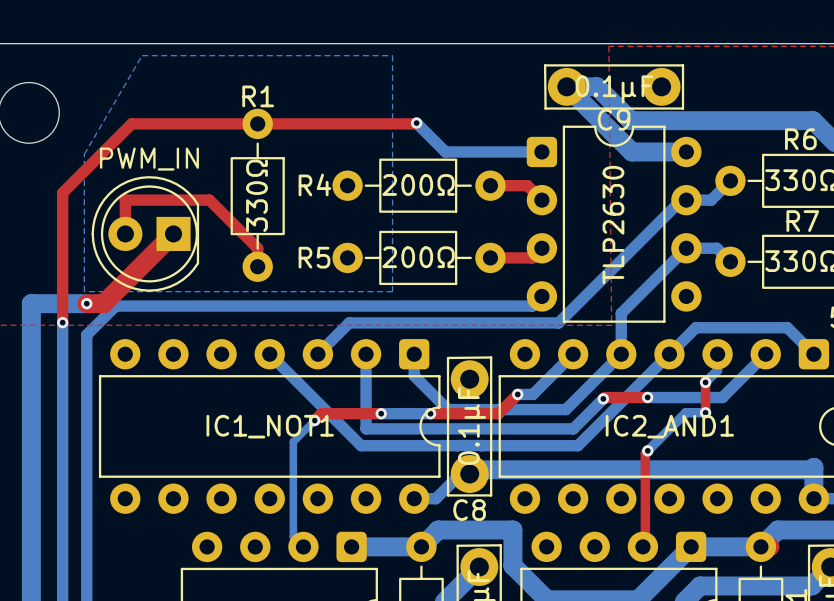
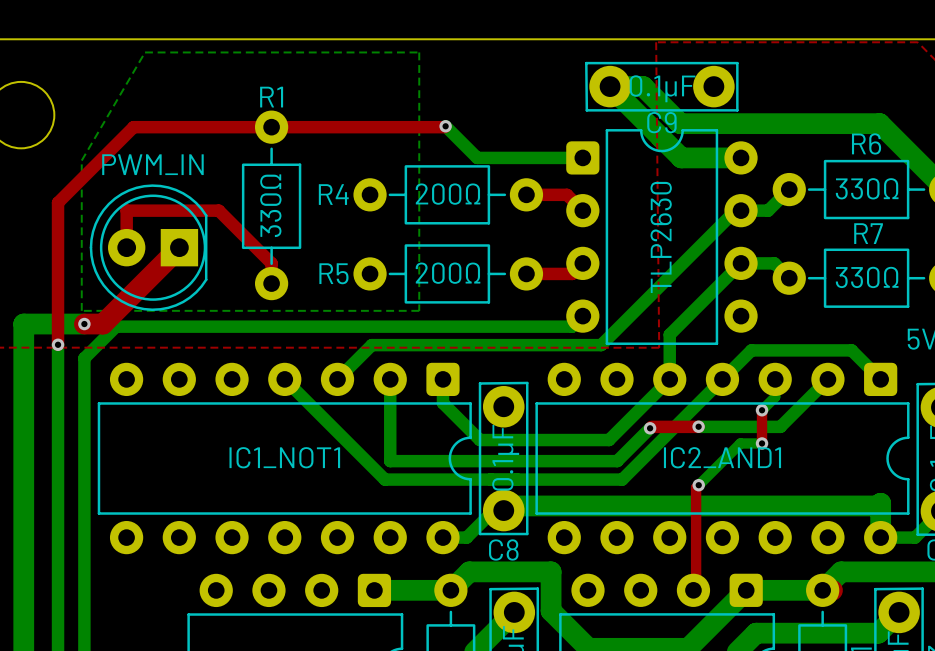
bottom track: (573, 354) (532, 394) (517, 394) -> none
top track: (517, 394) (498, 413) (430, 413) -> none
via: (517, 394) -> none
top track: (381, 413) (321, 413) (314, 420) -> none
bottom track: (381, 413) (430, 413) -> none
via: (381, 413) -> none
via: (430, 413) -> none
bottom track: (314, 420) (293, 441) (293, 536) (303, 546) -> none
via: (314, 420) -> none

